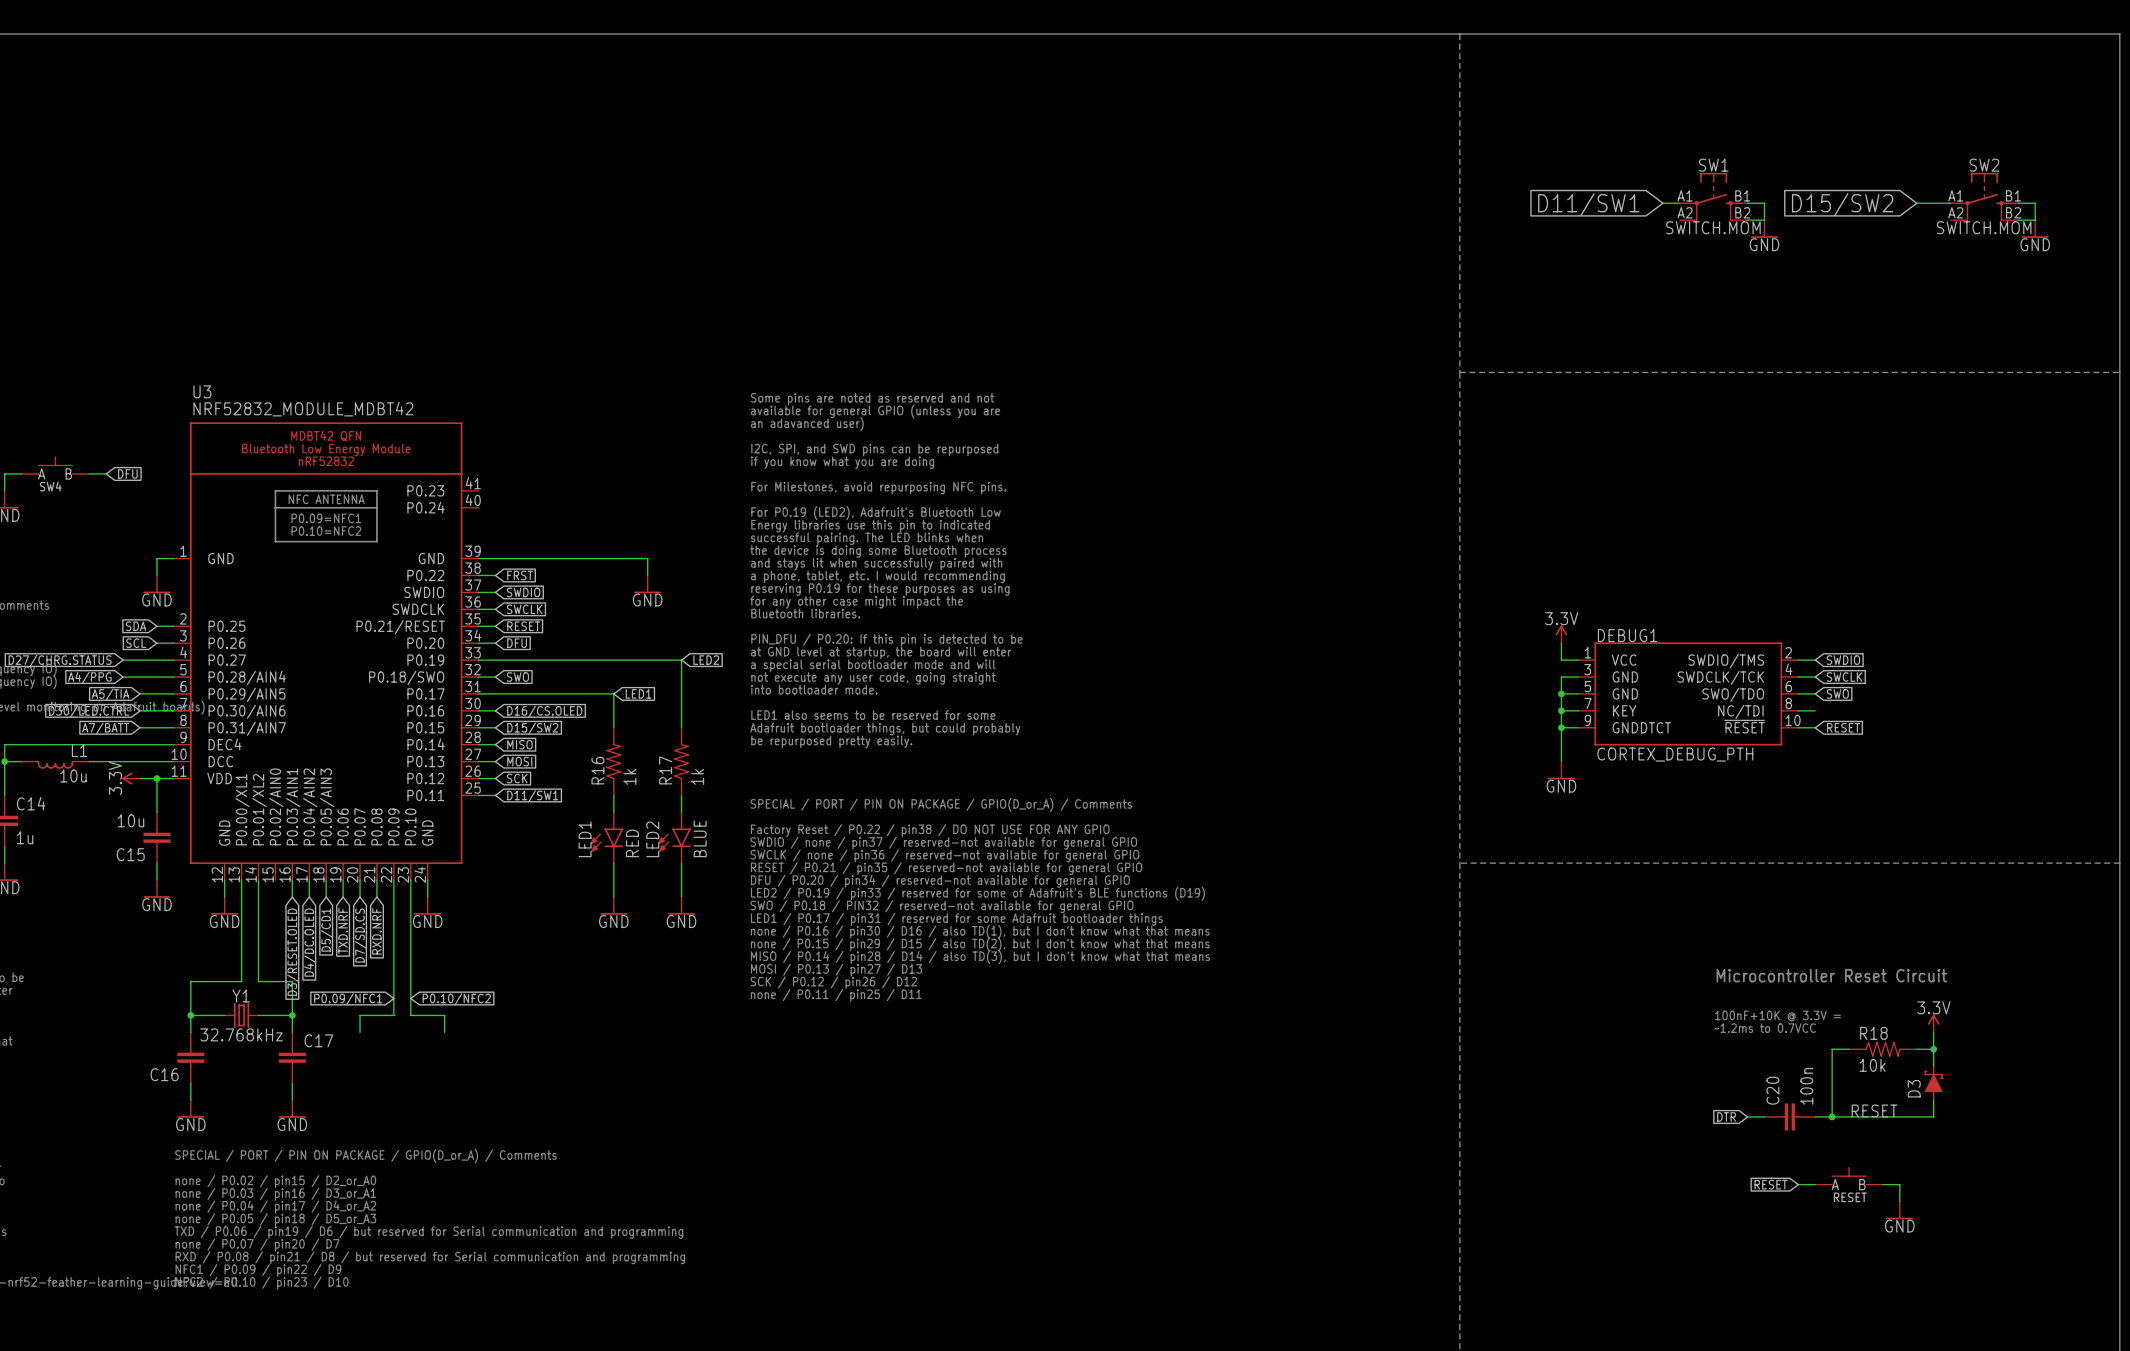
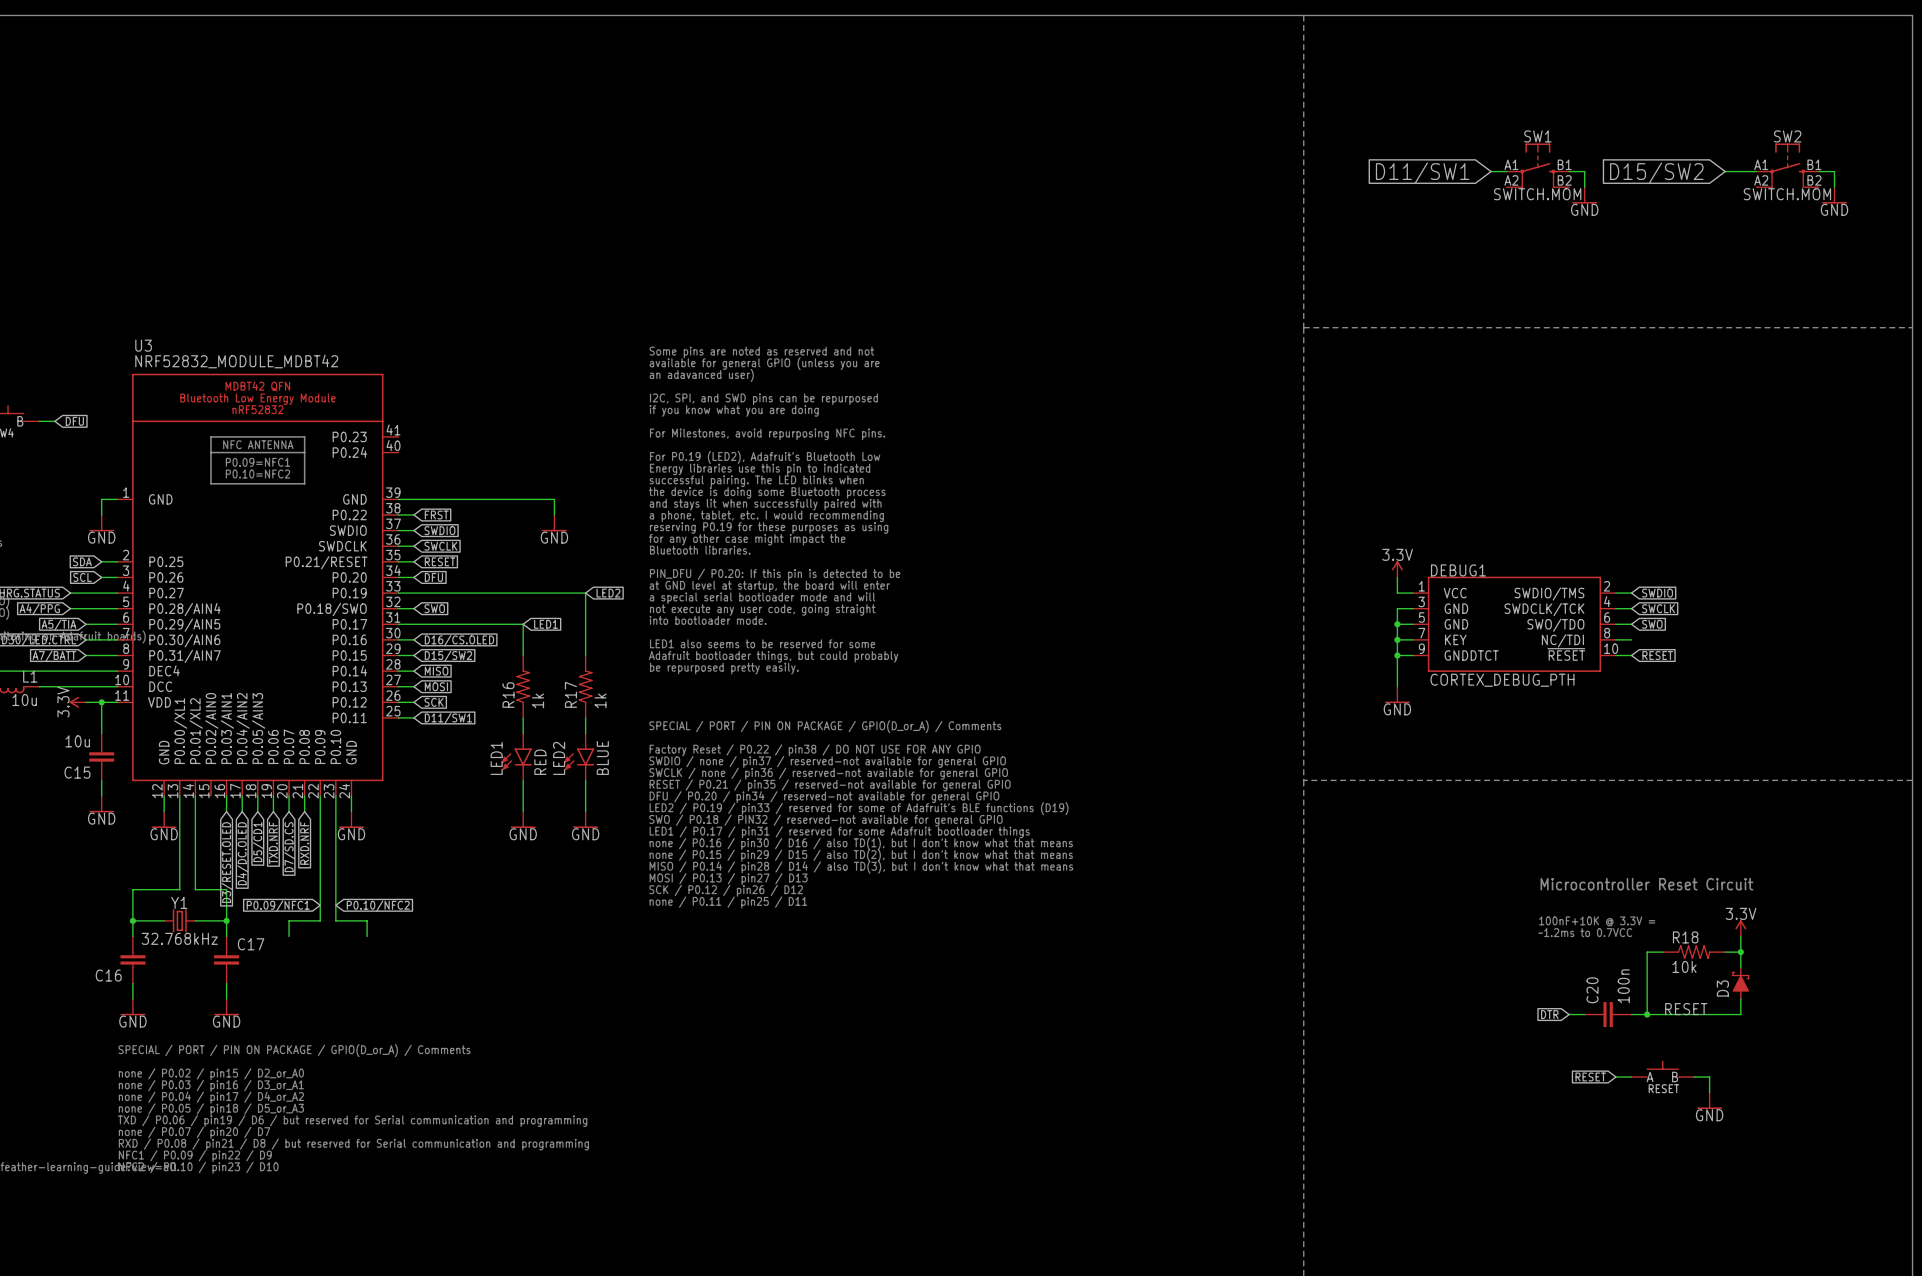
wire: (1747, 220) (1764, 220) -> none
wire: (2018, 220) (2035, 220) -> none

